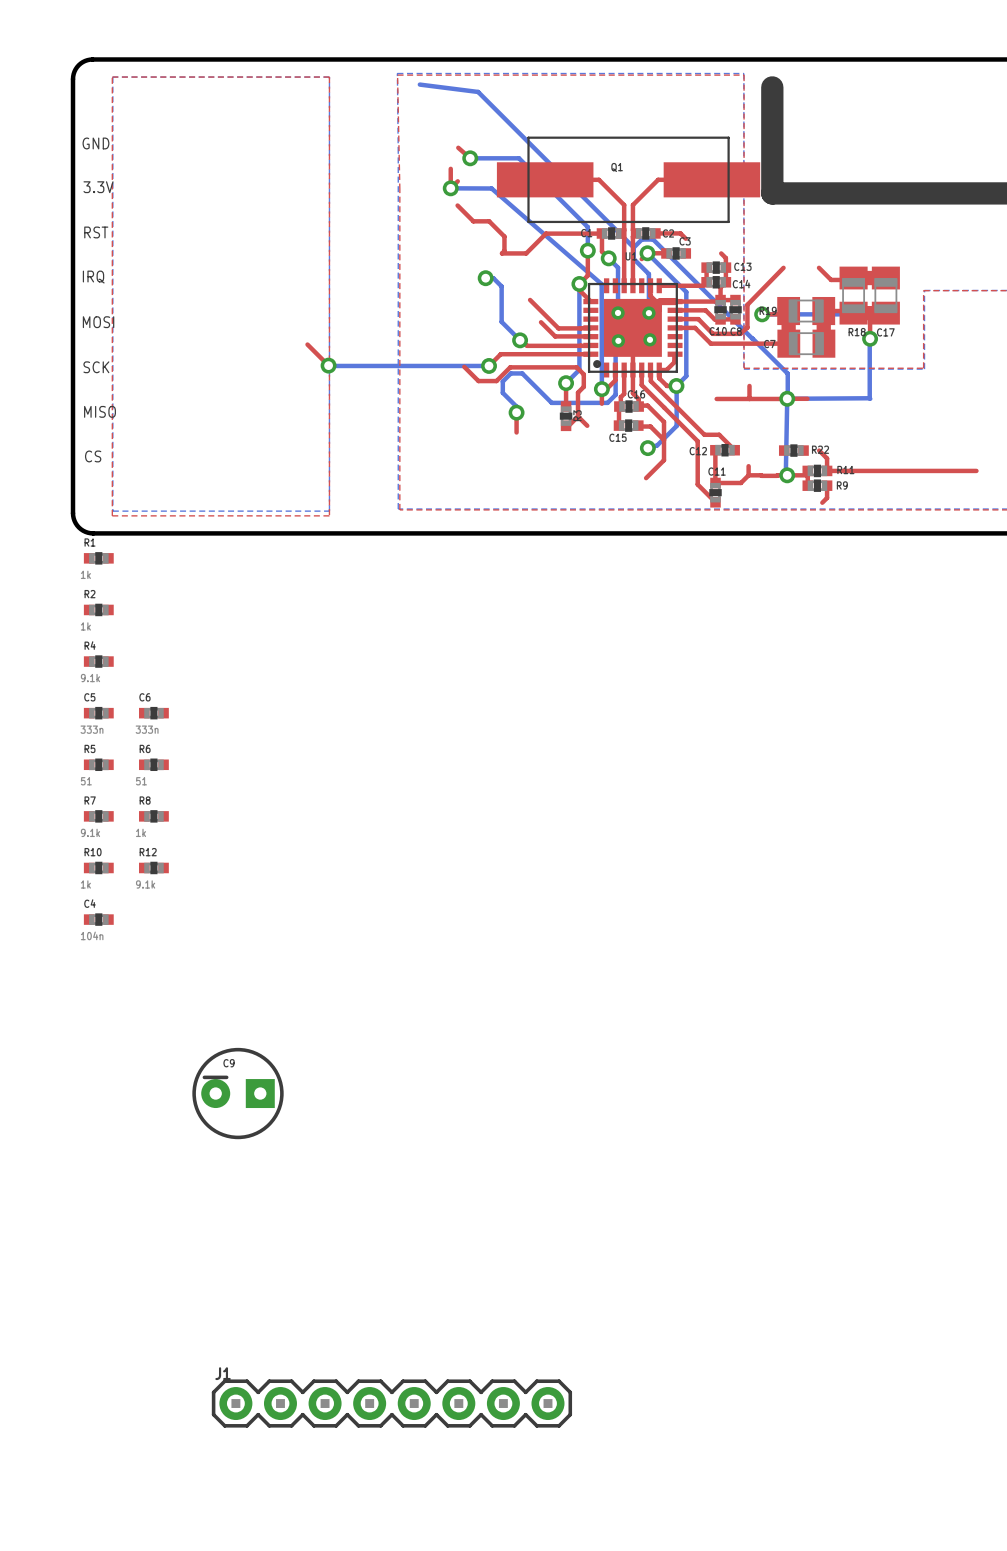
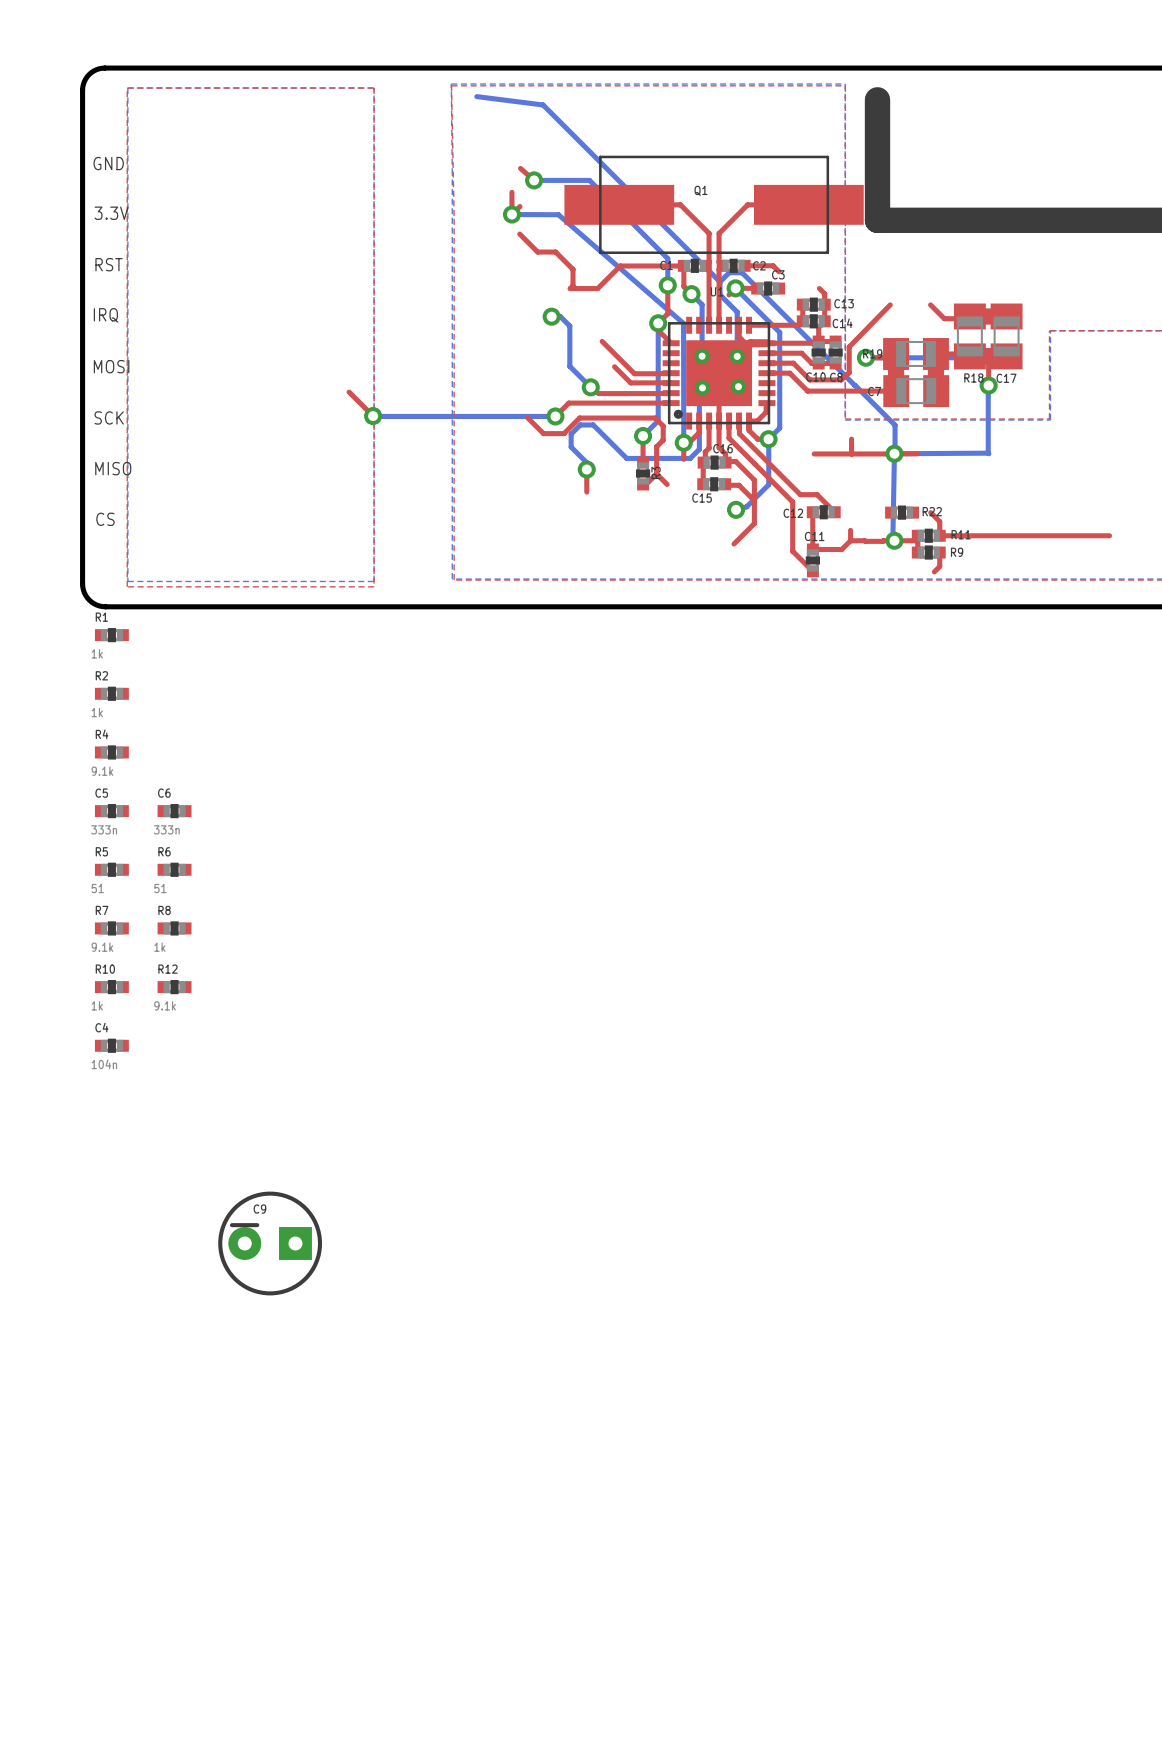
J1: (391, 1403) -> none

